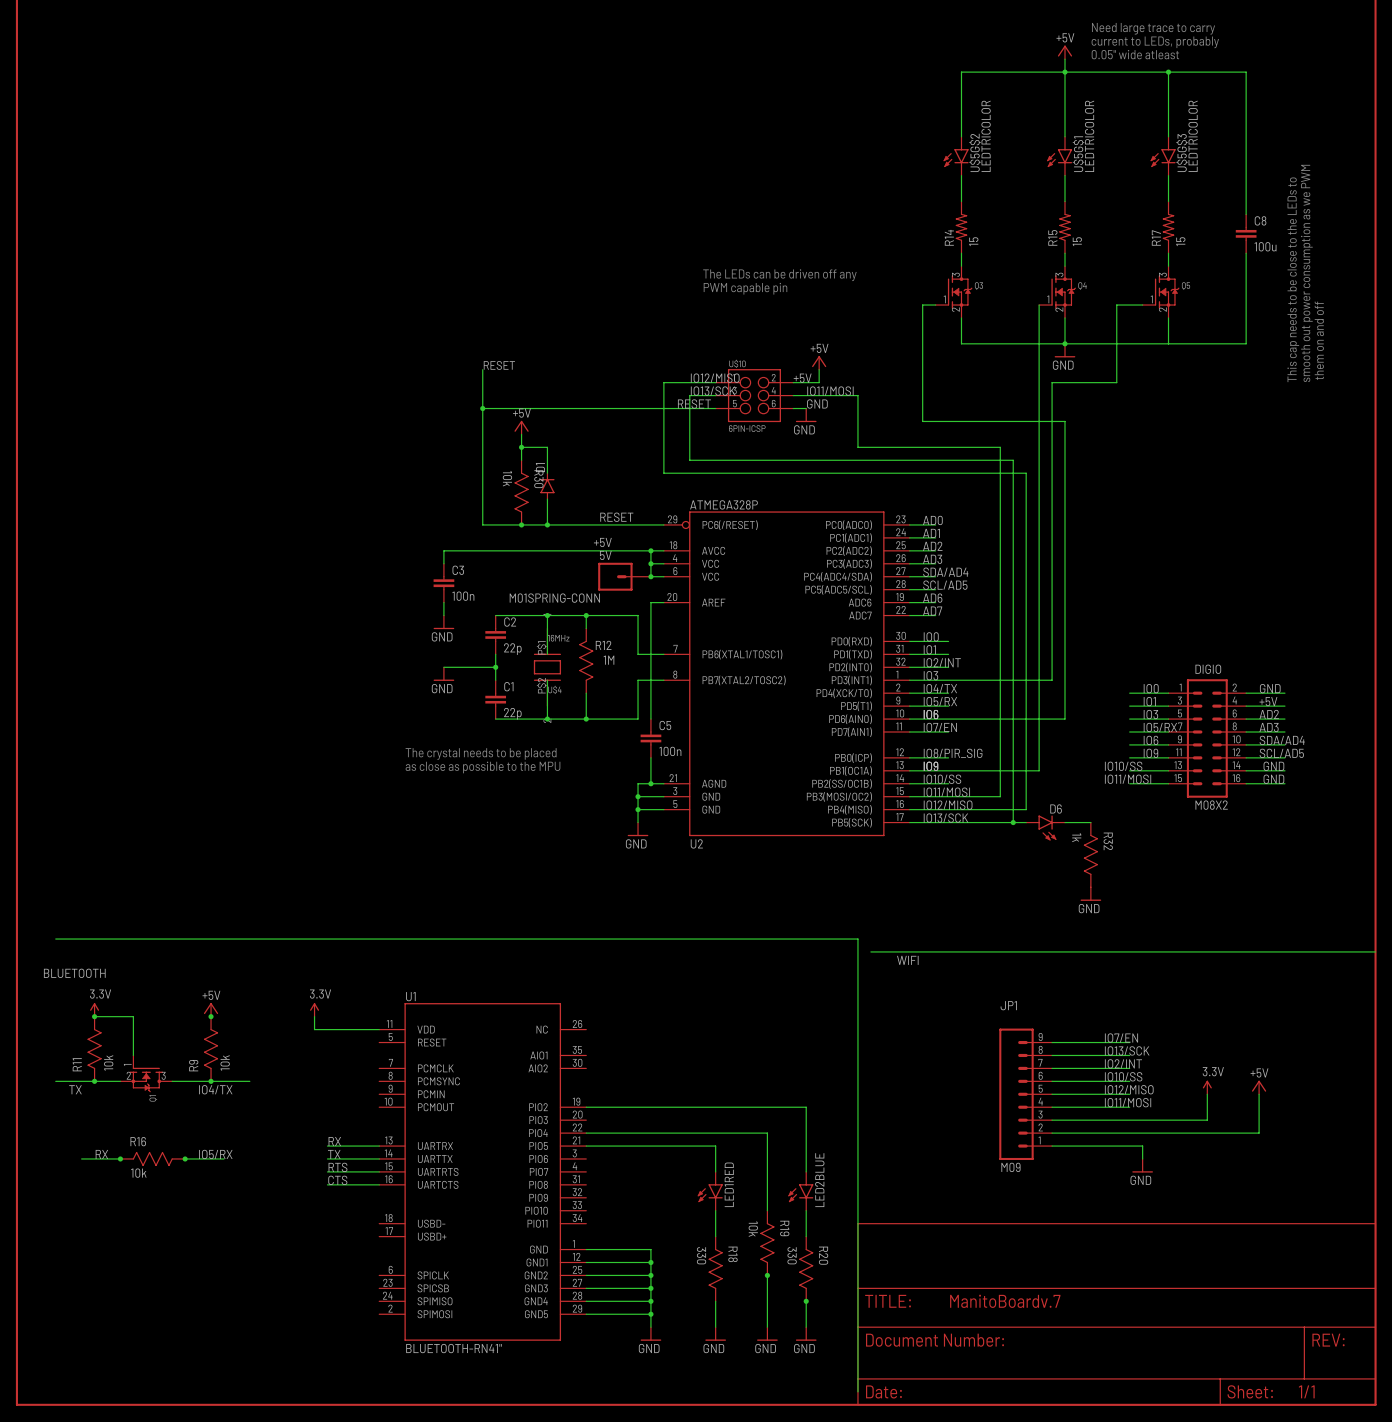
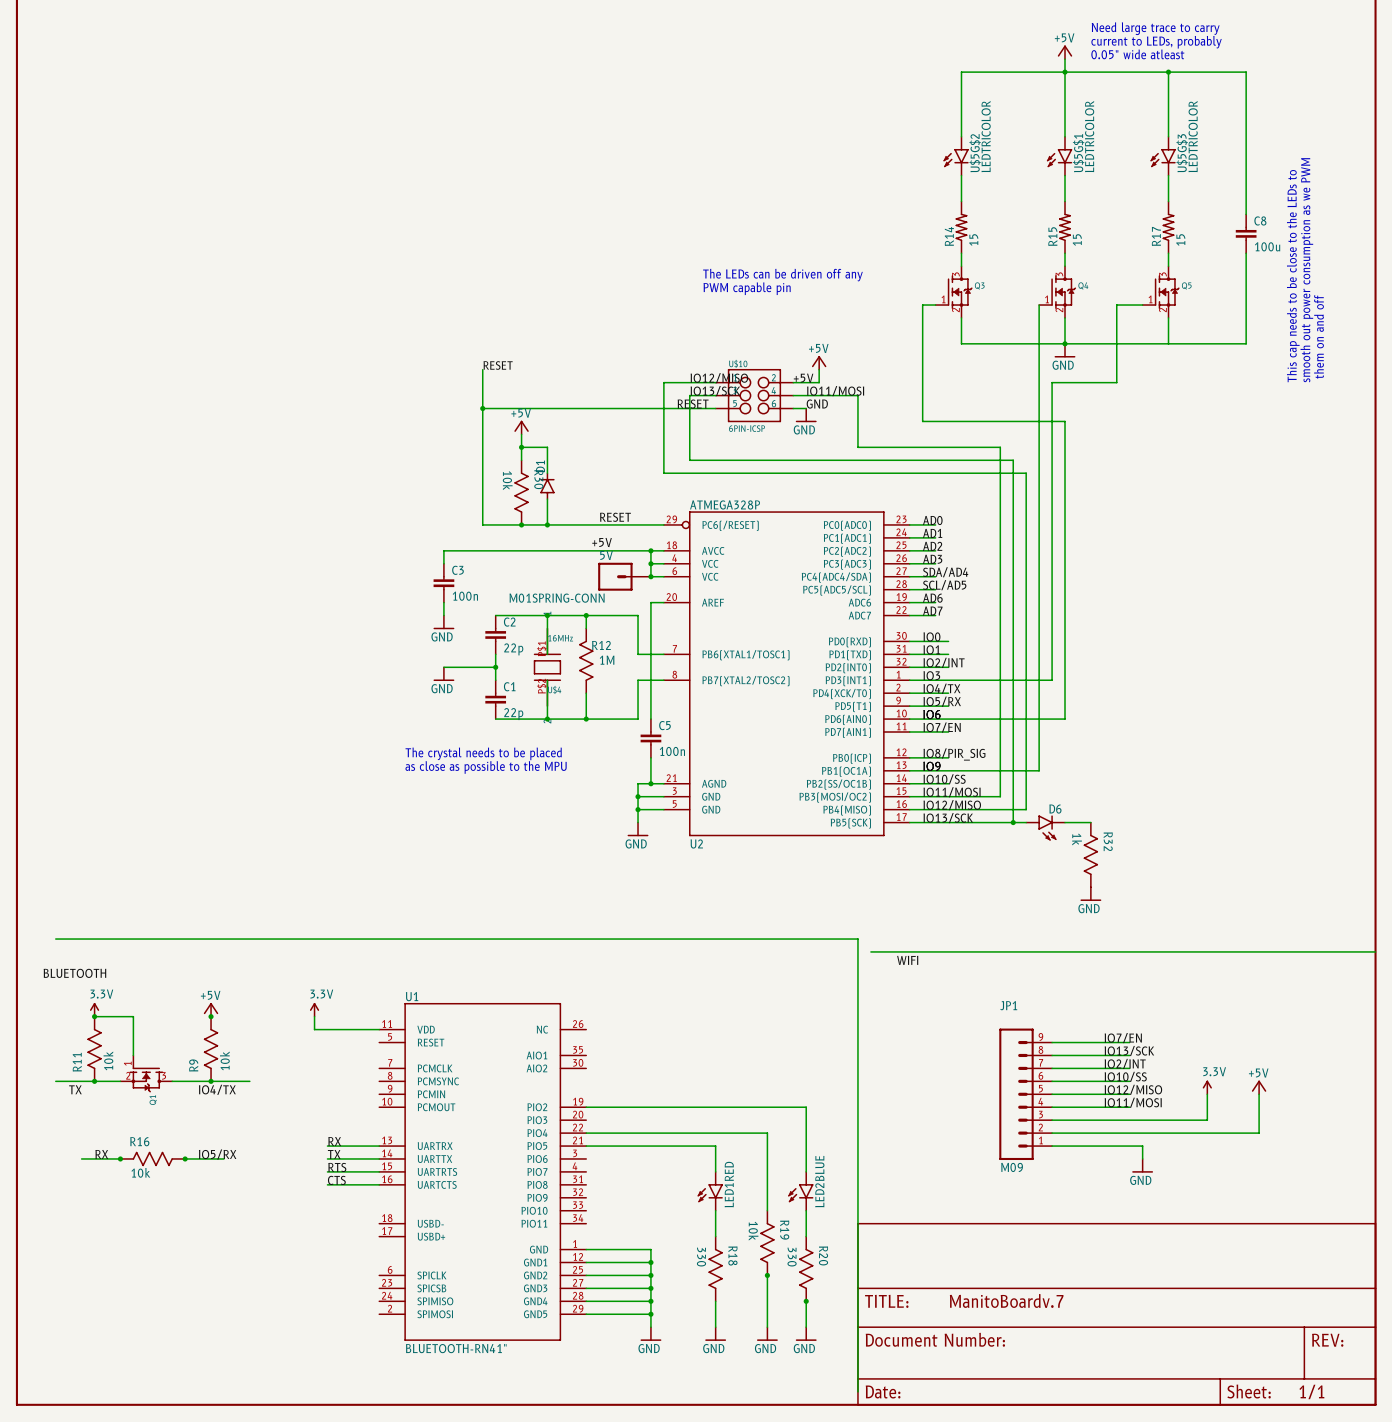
label: IO0 (1151, 688) -> none
label: GND (1270, 688) -> none
wire: (1129, 693) (1168, 693) -> none
wire: (1246, 693) (1284, 693) -> none
label: IO1 (1149, 701) -> none
label: +5V (1268, 701) -> none
wire: (1129, 706) (1168, 706) -> none
wire: (1246, 706) (1284, 706) -> none
label: IO3 (1150, 714) -> none
label: AD2 (1269, 714) -> none
wire: (1129, 719) (1168, 719) -> none
wire: (1246, 719) (1284, 719) -> none
label: IO5/RX (1160, 727) -> none
label: AD3 (1269, 727) -> none
wire: (1129, 732) (1168, 732) -> none
wire: (1246, 732) (1284, 732) -> none
DIGIO: M08X2 (1207, 738) -> none
label: IO6 (1151, 740) -> none
label: SDA/AD4 (1282, 740) -> none
wire: (1129, 744) (1168, 744) -> none
wire: (1246, 744) (1284, 744) -> none
label: IO9 (1150, 753) -> none
label: SCL/AD5 (1281, 753) -> none
wire: (1129, 757) (1168, 757) -> none
wire: (1246, 757) (1284, 757) -> none
label: IO10/SS (1123, 766) -> none
label: GND (1273, 766) -> none
wire: (1129, 770) (1168, 770) -> none
wire: (1246, 770) (1284, 770) -> none
label: IO11/MOSI (1128, 779) -> none
label: GND (1273, 779) -> none
wire: (1129, 783) (1168, 783) -> none
wire: (1246, 783) (1284, 783) -> none

